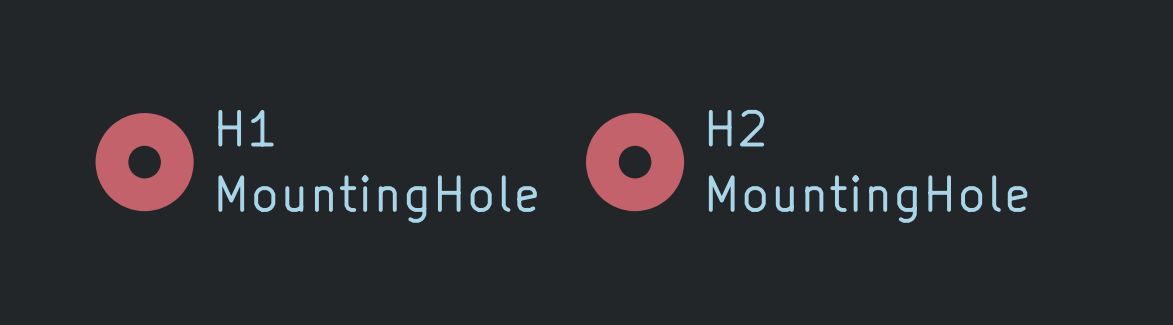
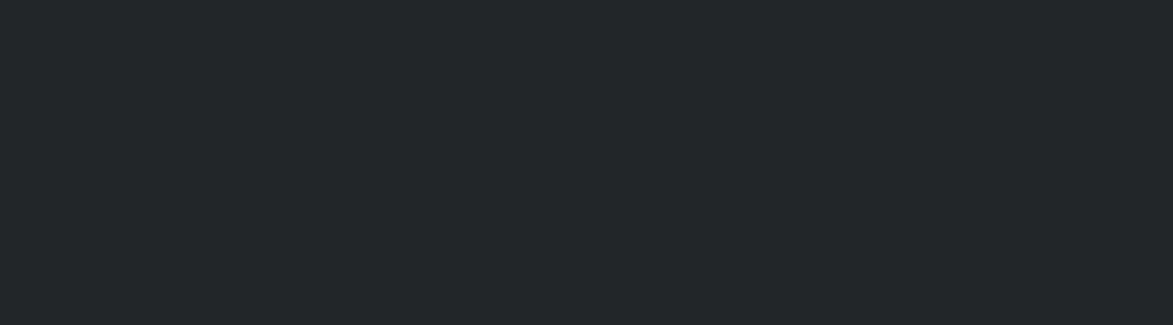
H1: MountingHole (144, 162) -> none
H2: MountingHole (635, 162) -> none

